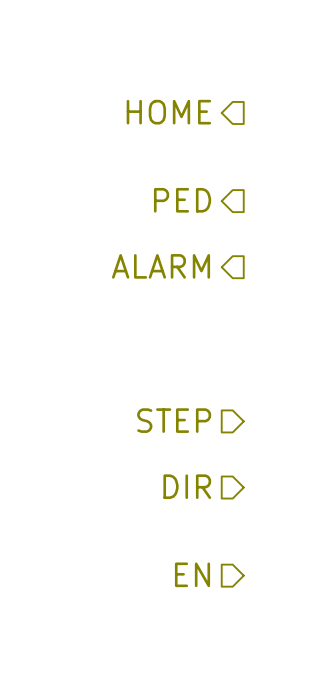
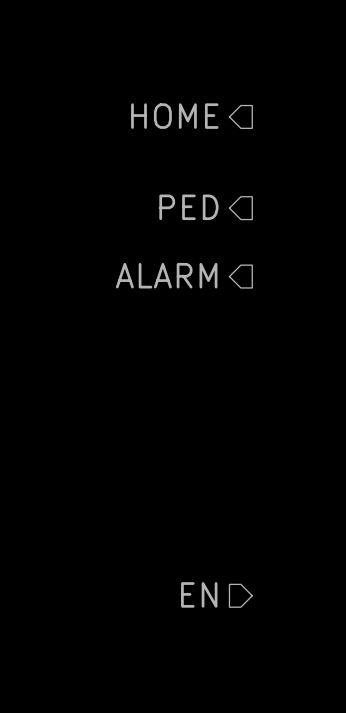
hierarchical label: STEP (174, 420) -> none
hierarchical label: DIR (187, 486) -> none

